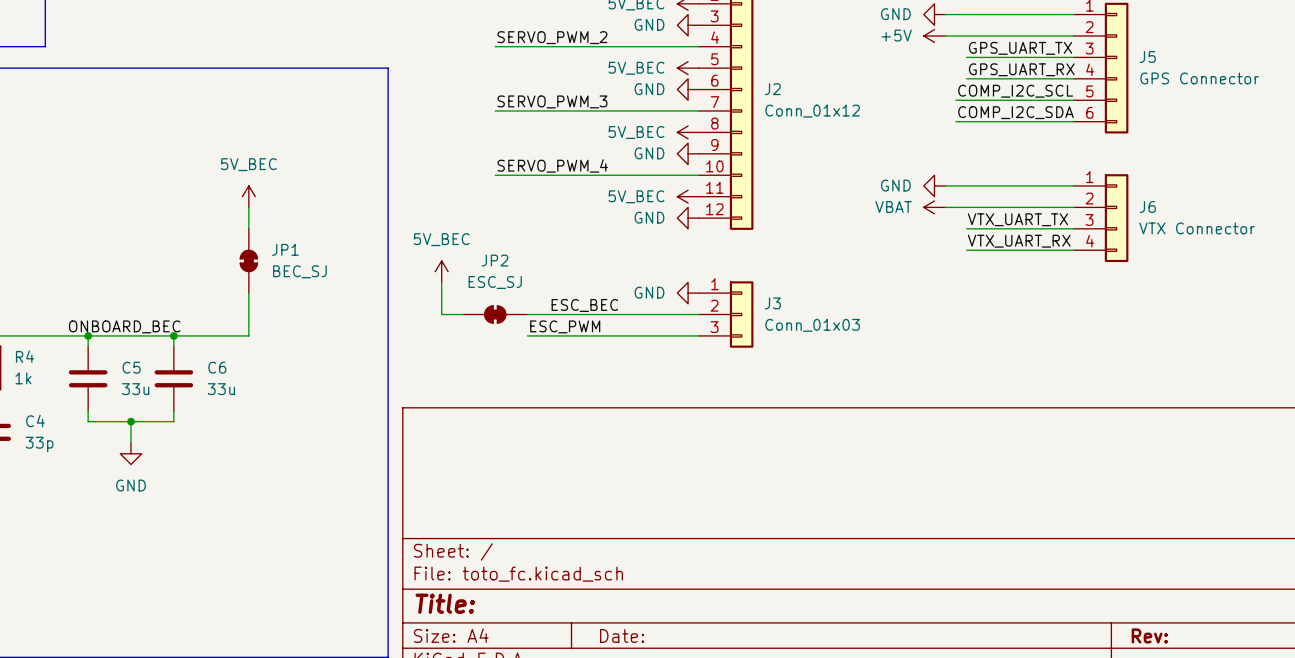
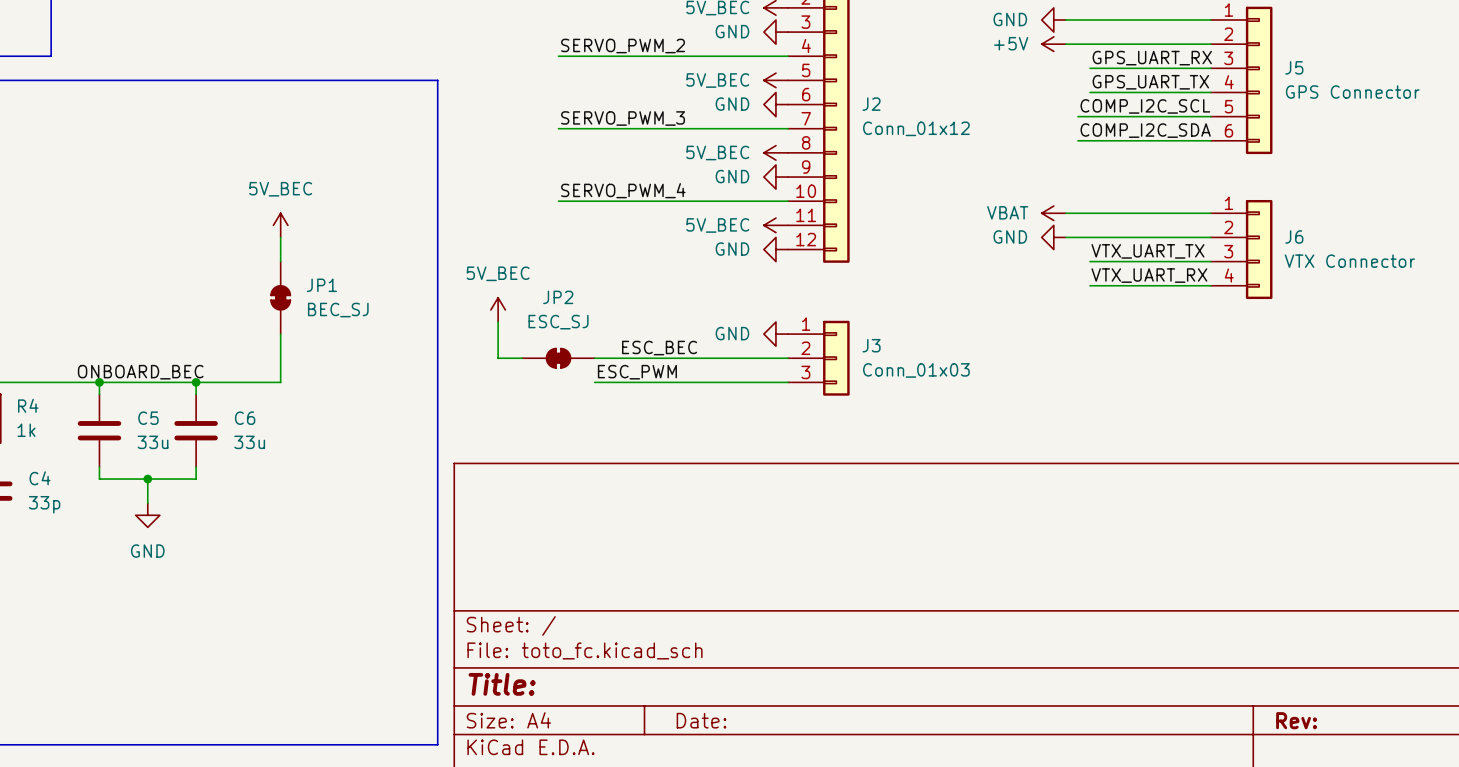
label: GPS_UART_TX (1020, 48) -> GPS_UART_RX (1152, 58)
label: GPS_UART_RX (1021, 69) -> GPS_UART_TX (1150, 82)
power symbol: GND (934, 185) -> VBAT (1053, 213)
power symbol: VBAT (934, 207) -> GND (1053, 237)

